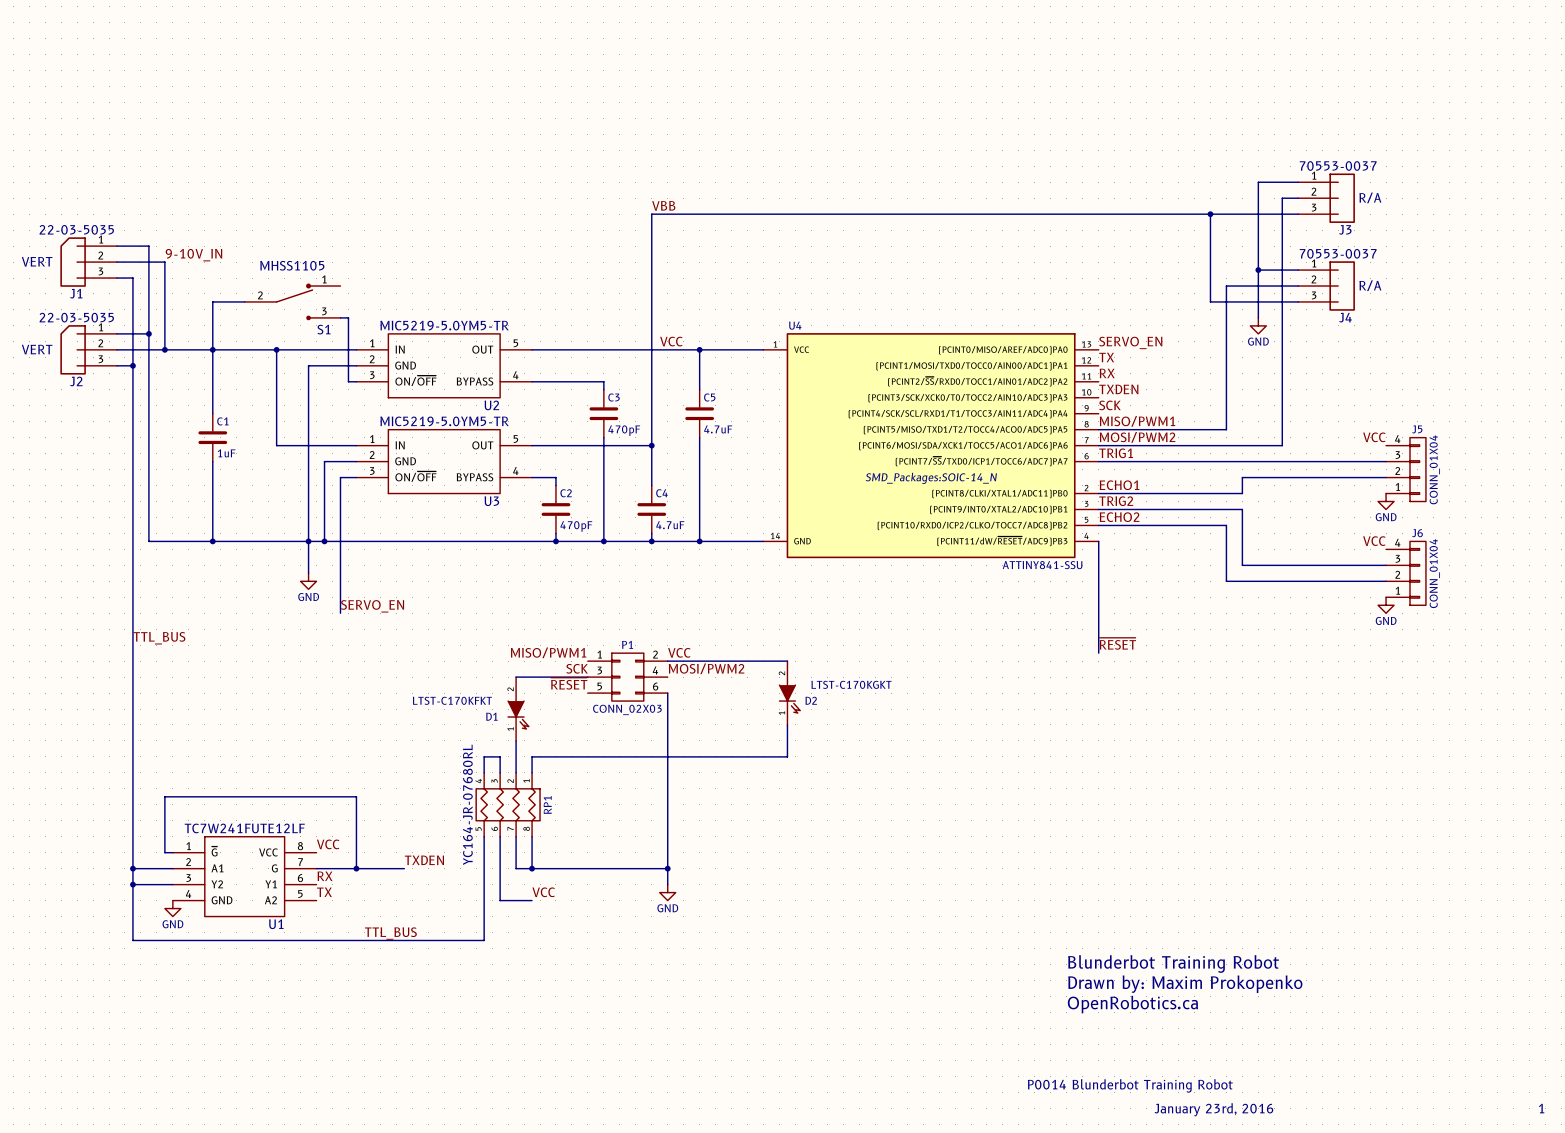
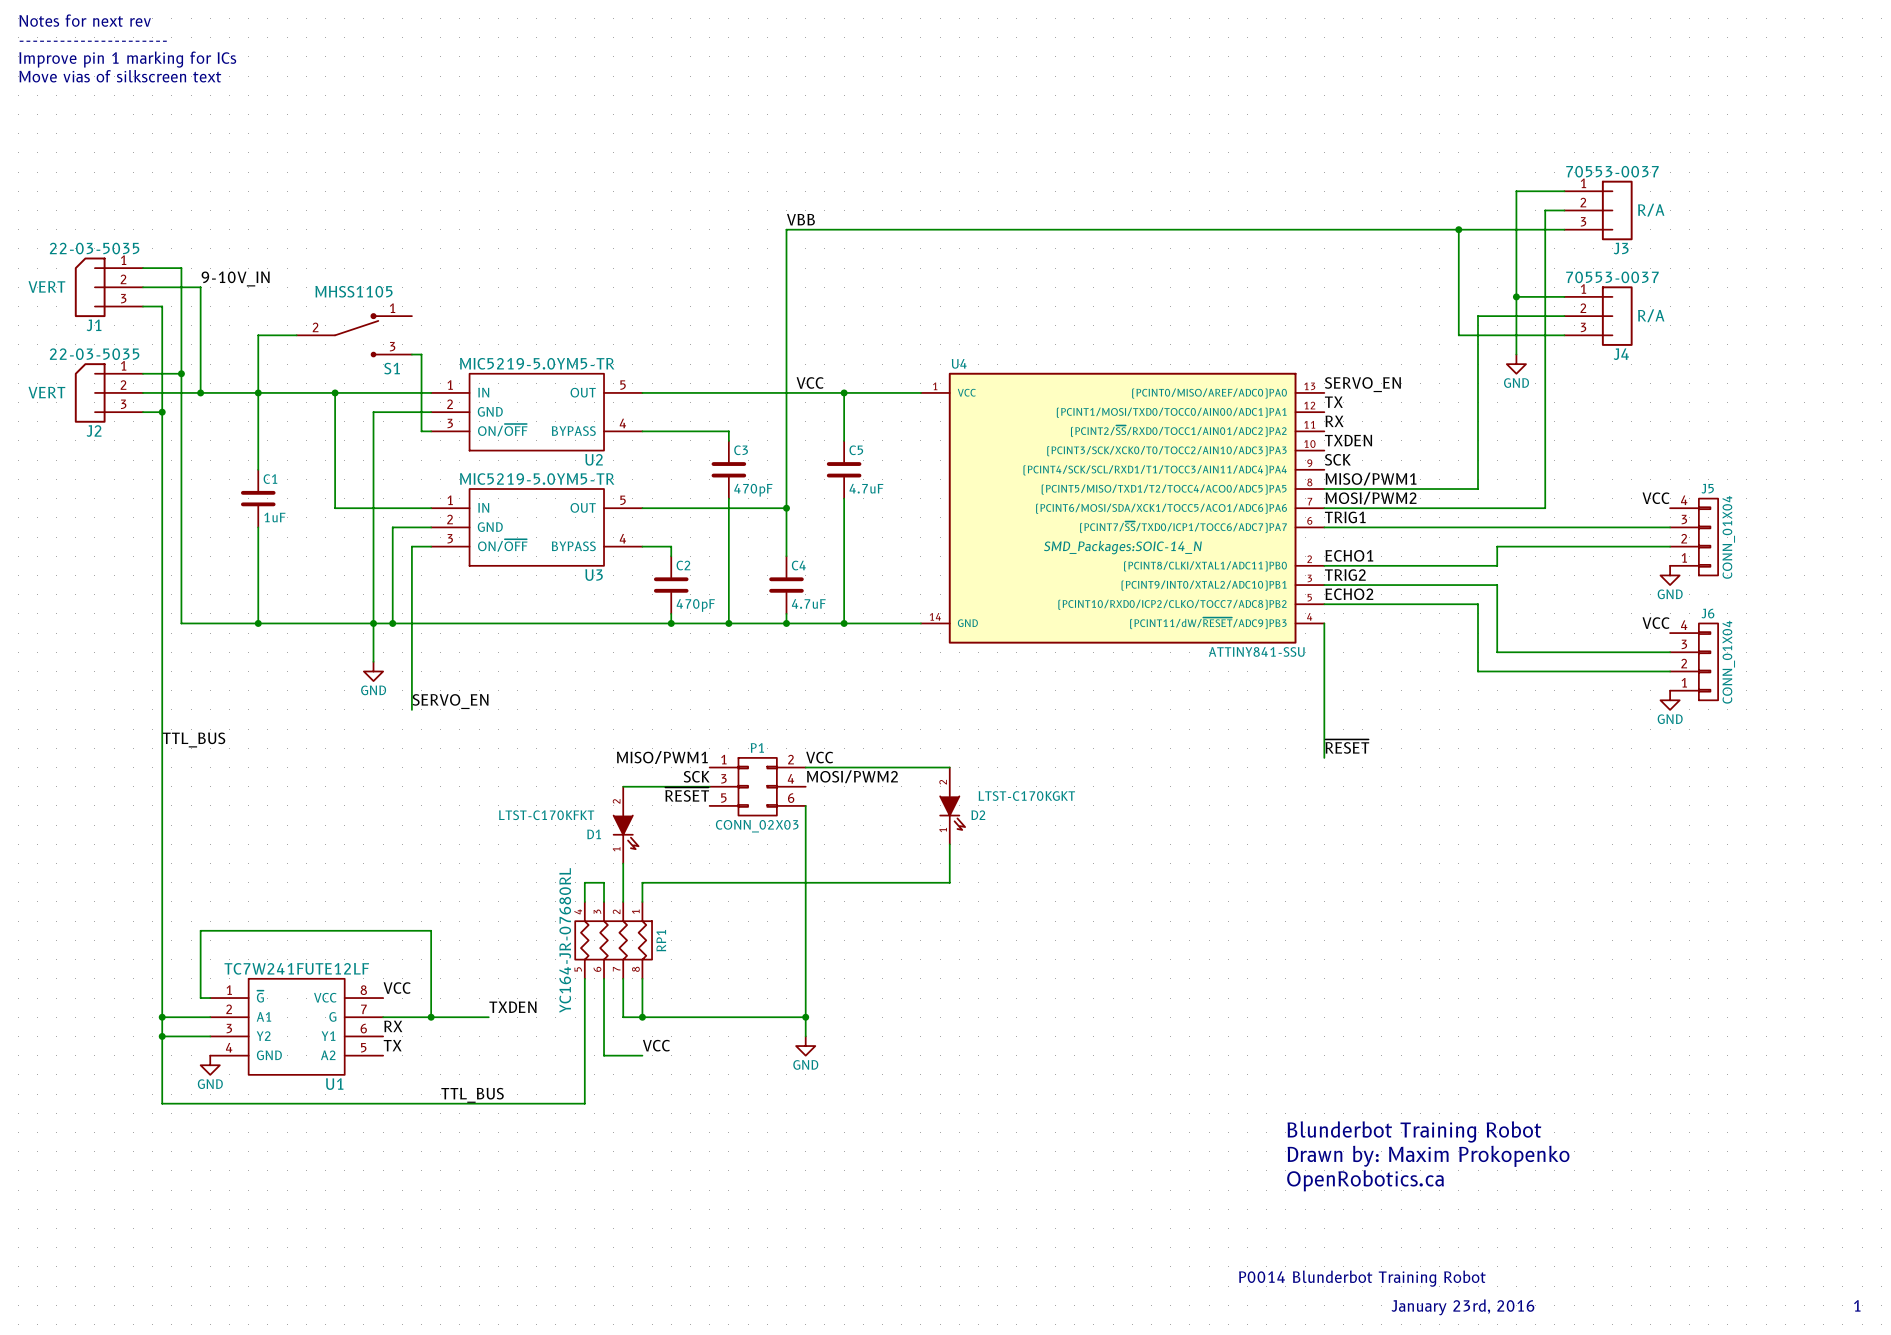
text: none -> Notes for next rev (85, 20)
text: none -> ---------------------- (93, 41)
text: none -> Improve pin 1 marking for ICs (127, 59)
text: none -> Move vias of silkscreen text (120, 76)

